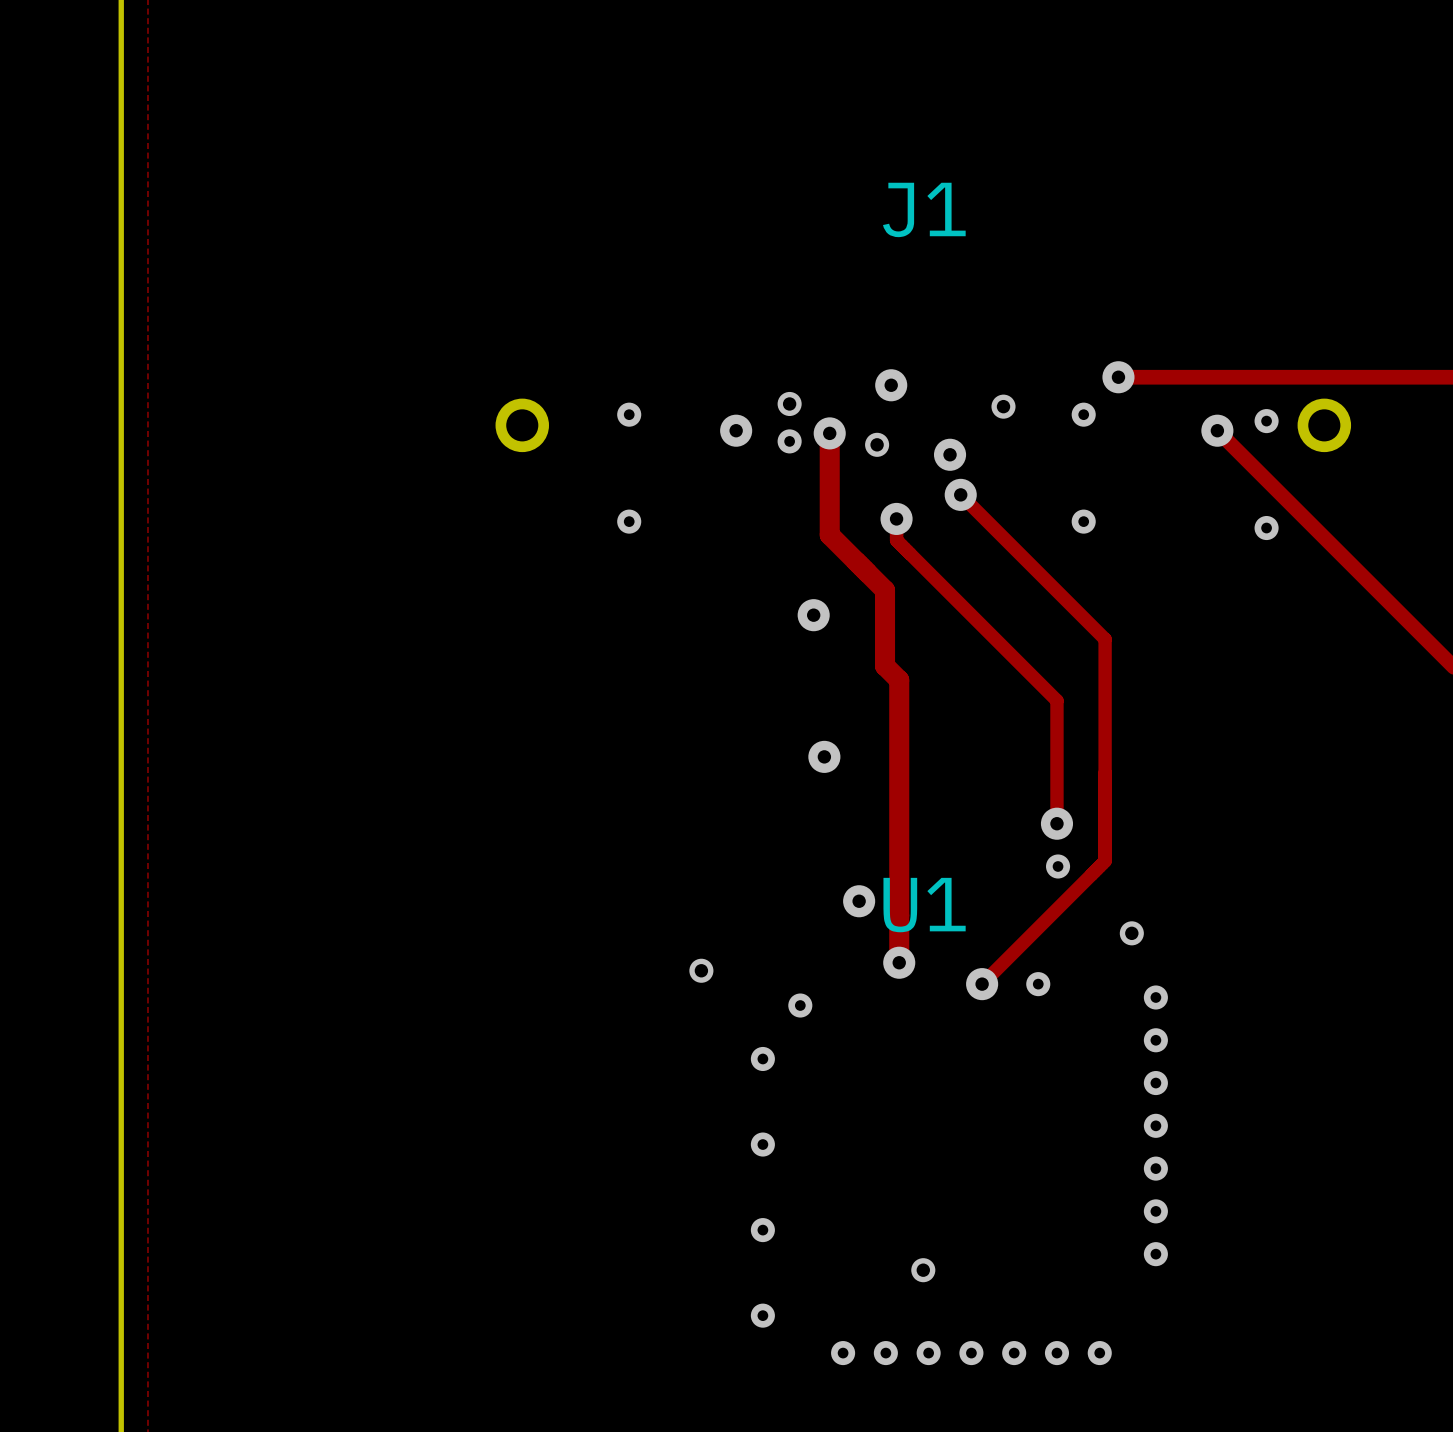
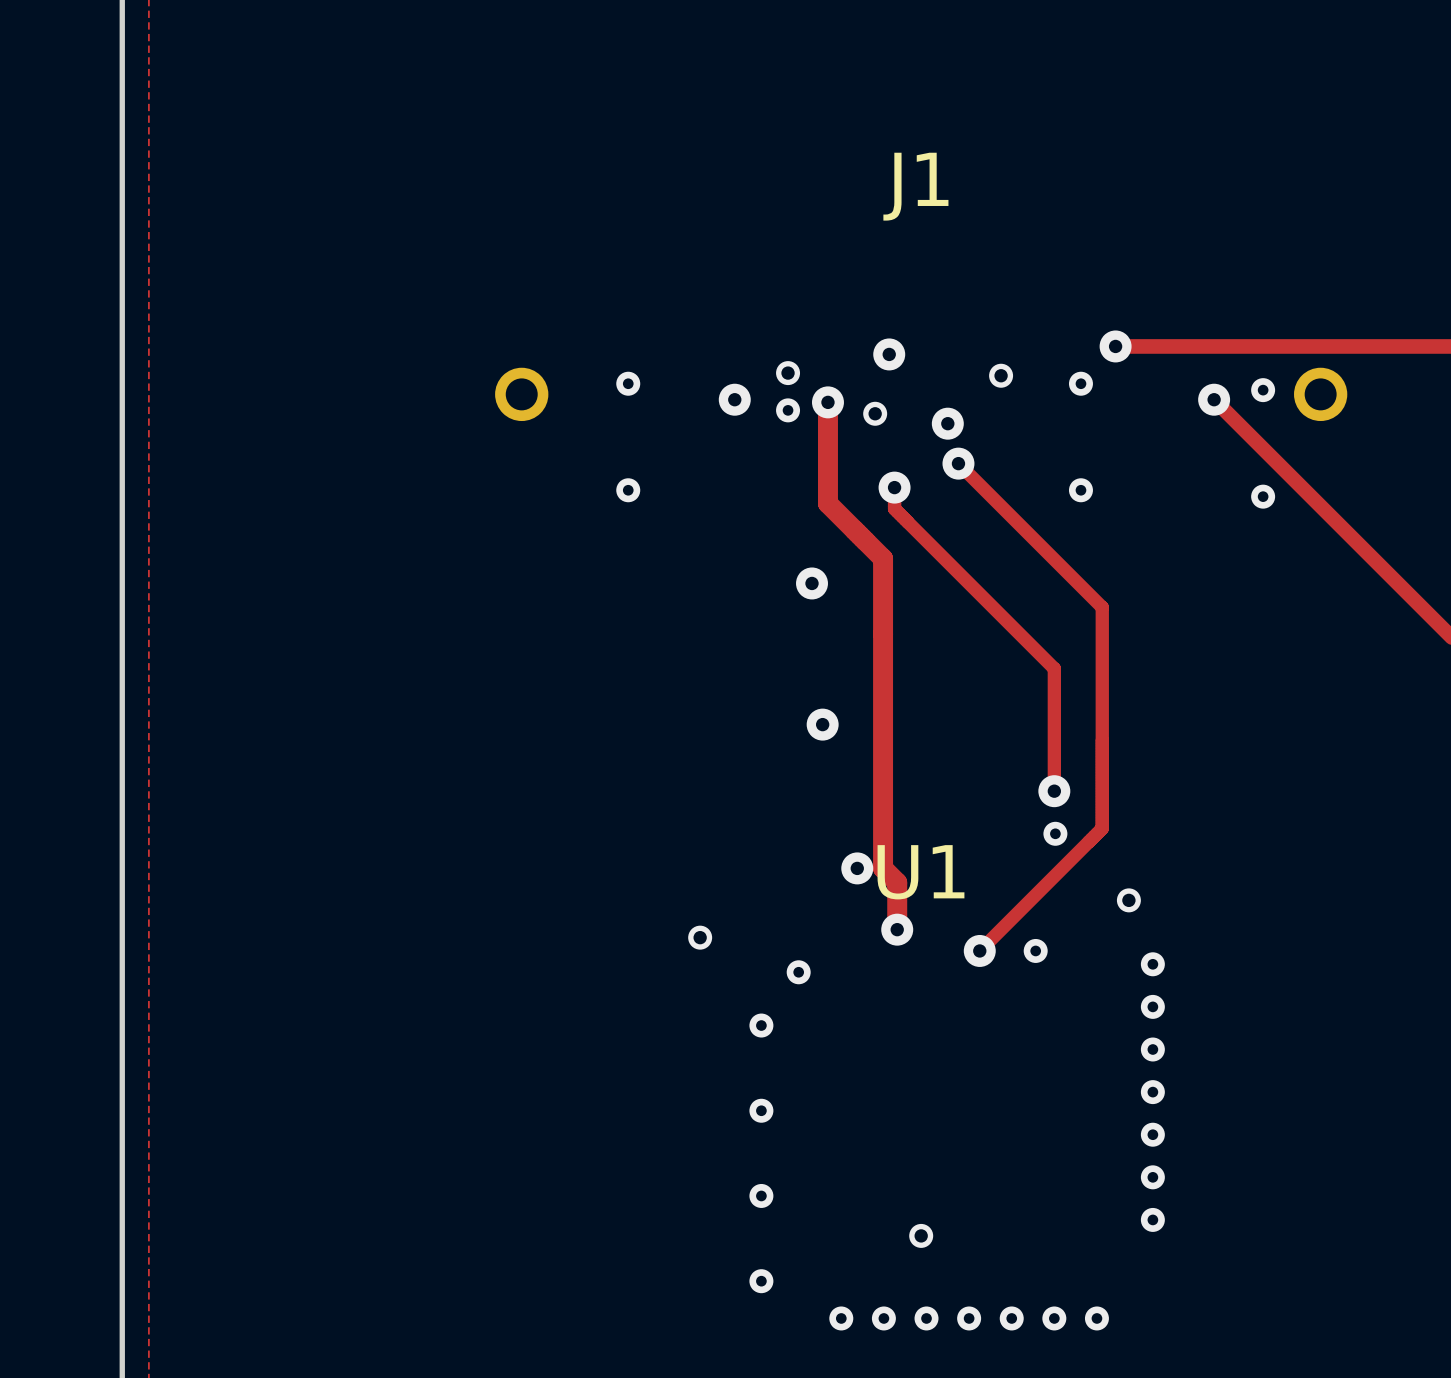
track: (885, 665) (899, 680) (899, 915) -> (883, 634) (883, 868) (897, 882)

